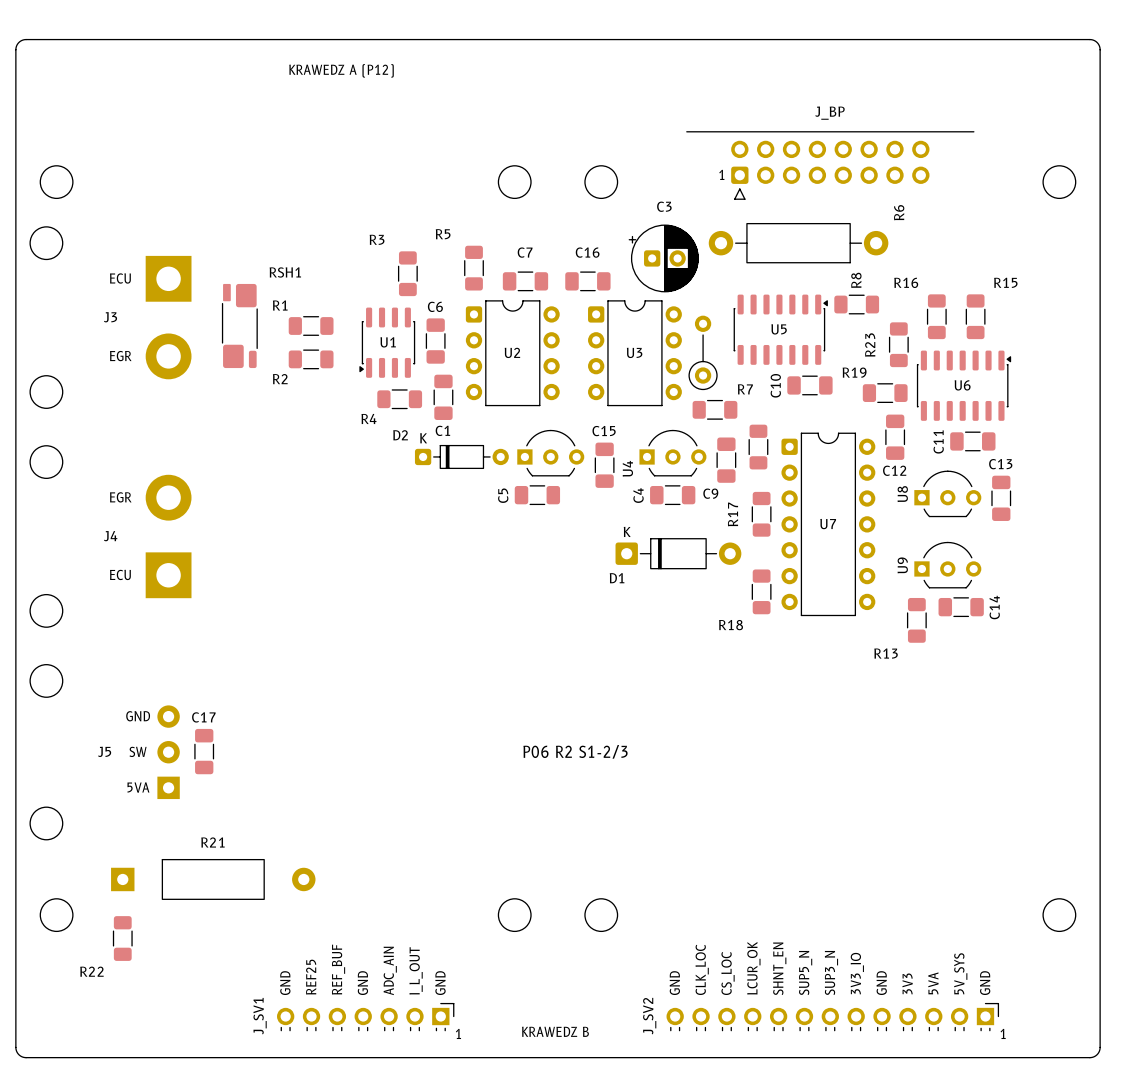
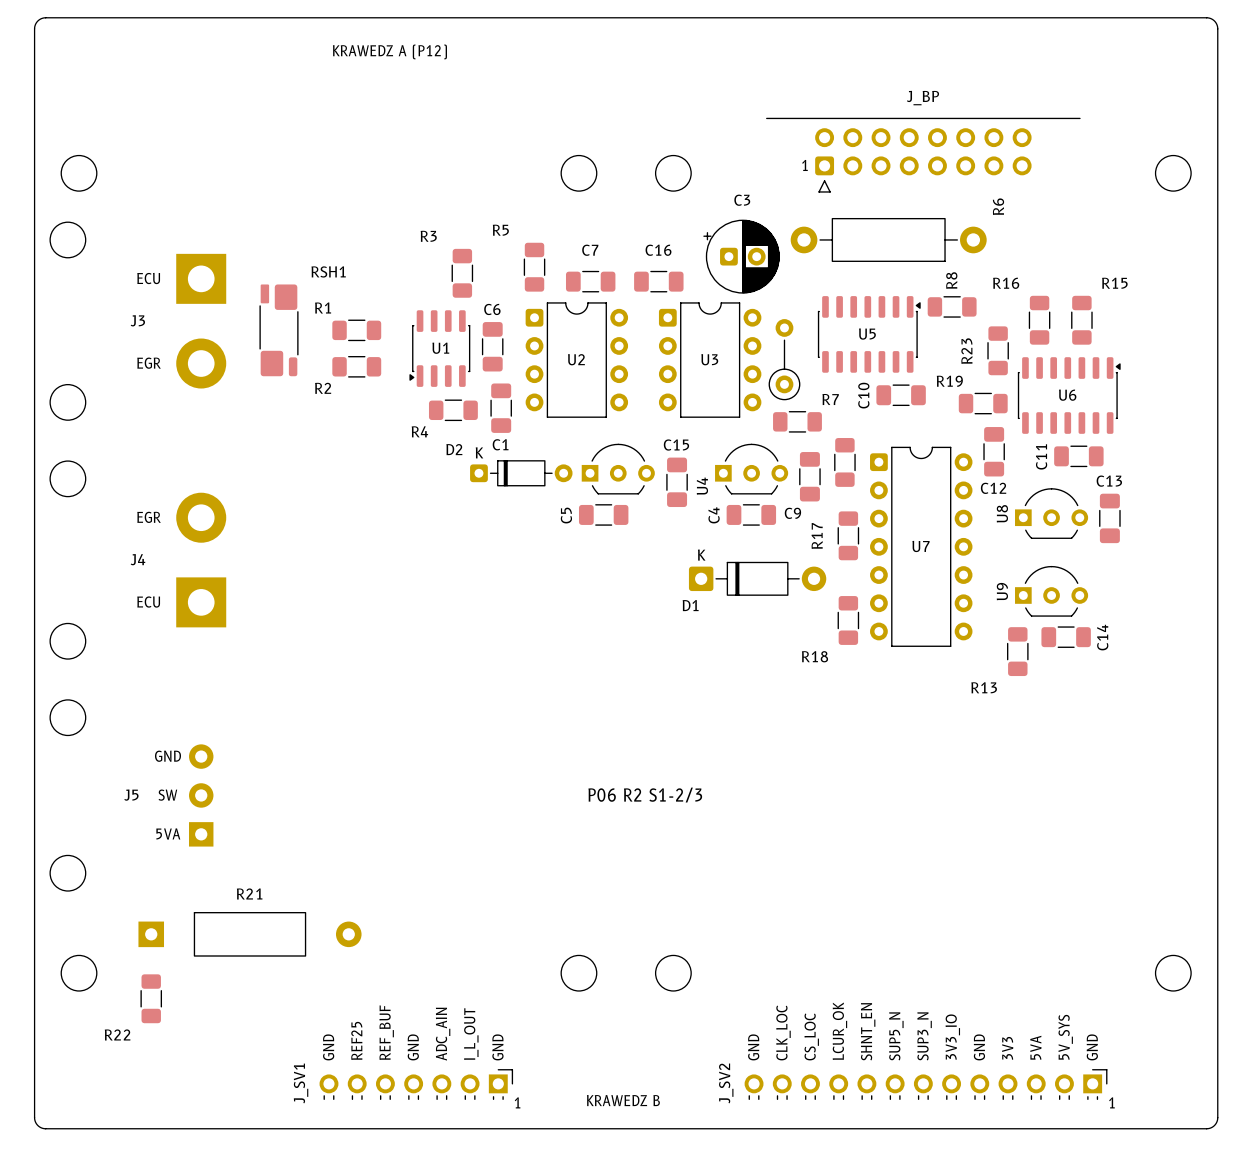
C17: (204, 751) -> none

